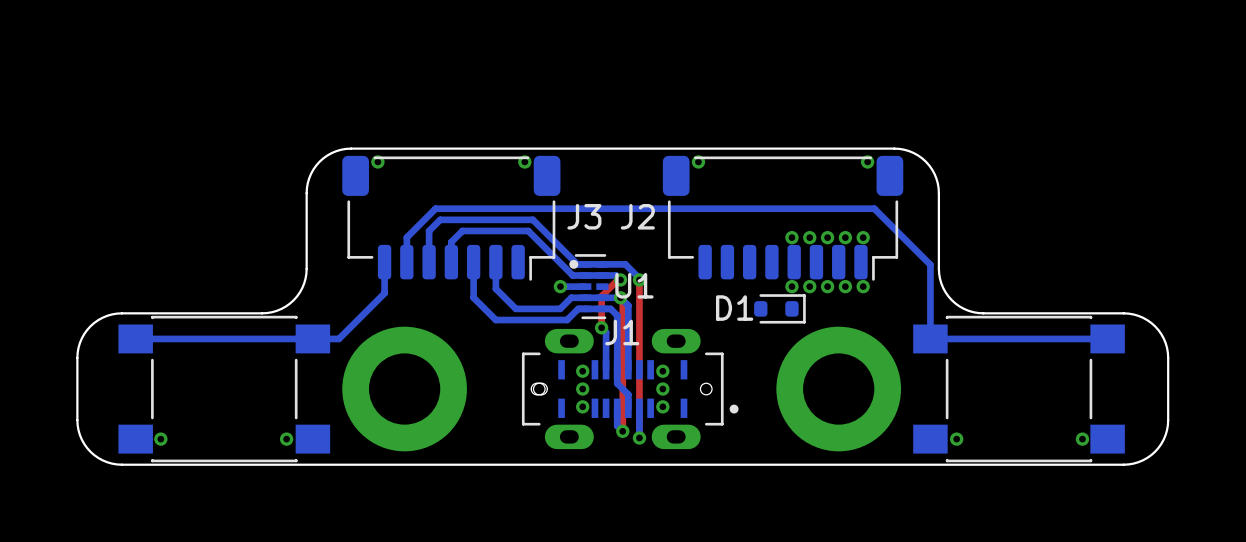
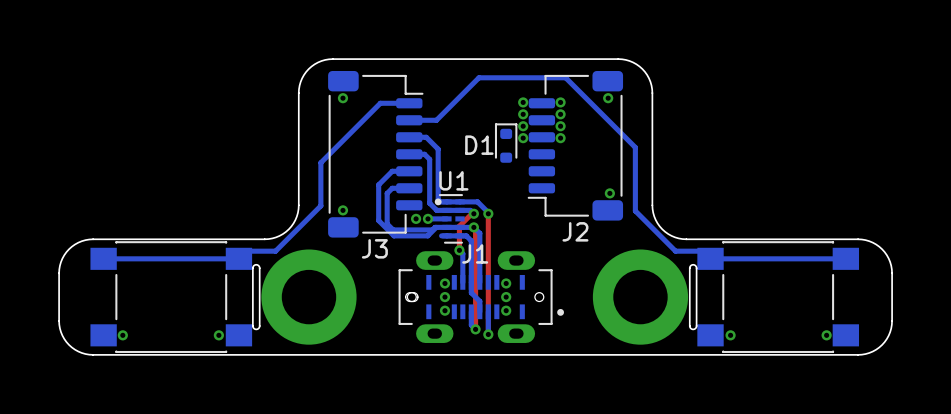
via: none -> (342, 98)
via: none -> (608, 98)
via: none -> (523, 102)
via: none -> (560, 102)
bottom track: none -> (409, 103) (380, 103) (320, 162) (320, 205) (275, 251) (246, 251)
via: none -> (523, 114)
via: none -> (560, 114)
J2 footprint: [662, 155, 904, 281] -> [527, 70, 624, 221]
bottom track: none -> (400, 120) (436, 120) (478, 77) (565, 77) (635, 147) (635, 210) (675, 251) (702, 251)
via: (377, 161) -> none
via: (524, 161) -> none
via: (698, 161) -> none
via: (867, 161) -> none
via: none -> (523, 126)
via: none -> (560, 126)
via: none -> (523, 138)
via: none -> (560, 138)
J3 name position: J3 (584, 216) -> J3 (374, 248)
J2 name position: J2 (637, 216) -> J2 (575, 231)
J3 rotation: 0° (451, 218) -> 90° counterclockwise (375, 154)
bottom track: none -> (409, 171) (392, 171) (378, 184) (378, 200)
via: (791, 237) -> none
via: (809, 237) -> none
via: (827, 237) -> none
via: (845, 237) -> none
via: (863, 237) -> none
bottom track: none -> (409, 188) (392, 188) (387, 193) (387, 223) (393, 229) (432, 229) (436, 227)
via: none -> (609, 193)
bottom track: (384, 262) (384, 293) (338, 338) (312, 338) -> none
bottom track: (406, 262) (406, 237) (435, 208) (874, 208) (930, 264) (930, 338) -> none
bottom track: (429, 262) (429, 230) (440, 219) (532, 219) (577, 264) -> (400, 137) (426, 137) (438, 149) (438, 199) (440, 201)
bottom track: (451, 262) (451, 242) (462, 230) (528, 230) (572, 275) -> (400, 154) (424, 154) (429, 159) (429, 203) (437, 210)
bottom track: (473, 262) (473, 297) (495, 320) (567, 320) (578, 308) -> none
via: none -> (342, 210)
U1 name position: U1 (634, 285) -> U1 (453, 180)
via: none -> (416, 218)
via: (791, 286) -> none
via: (809, 286) -> none
via: (827, 286) -> none
via: (845, 286) -> none
via: (863, 286) -> none
D1 rotation: 0° (779, 308) -> 90° counterclockwise (506, 143)
D1 position: (779, 308) -> (506, 143)
board edge: (983, 313) (968, 310) (955, 303) (948, 296) (941, 283) (938, 268) (938, 188) (934, 173) (929, 165) (918, 155) (909, 151) (894, 148) (341, 149) (331, 153) (319, 161) (313, 169) (307, 183) (306, 268) (302, 288) (296, 296) (285, 306) (272, 312) (262, 313) -> (750, 239) (682, 239) (668, 234) (659, 226) (652, 209) (651, 85) (647, 74) (639, 66) (629, 60) (618, 59) (332, 59) (318, 62) (303, 74) (298, 89) (298, 205) (293, 223) (282, 234) (272, 238) (200, 239)
board edge: none -> (259, 268) (259, 325) (256, 329) (252, 325) (252, 268) (256, 264) (259, 268)
board edge: none -> (696, 268) (696, 325) (693, 329) (689, 325) (689, 268) (693, 264) (696, 268)

